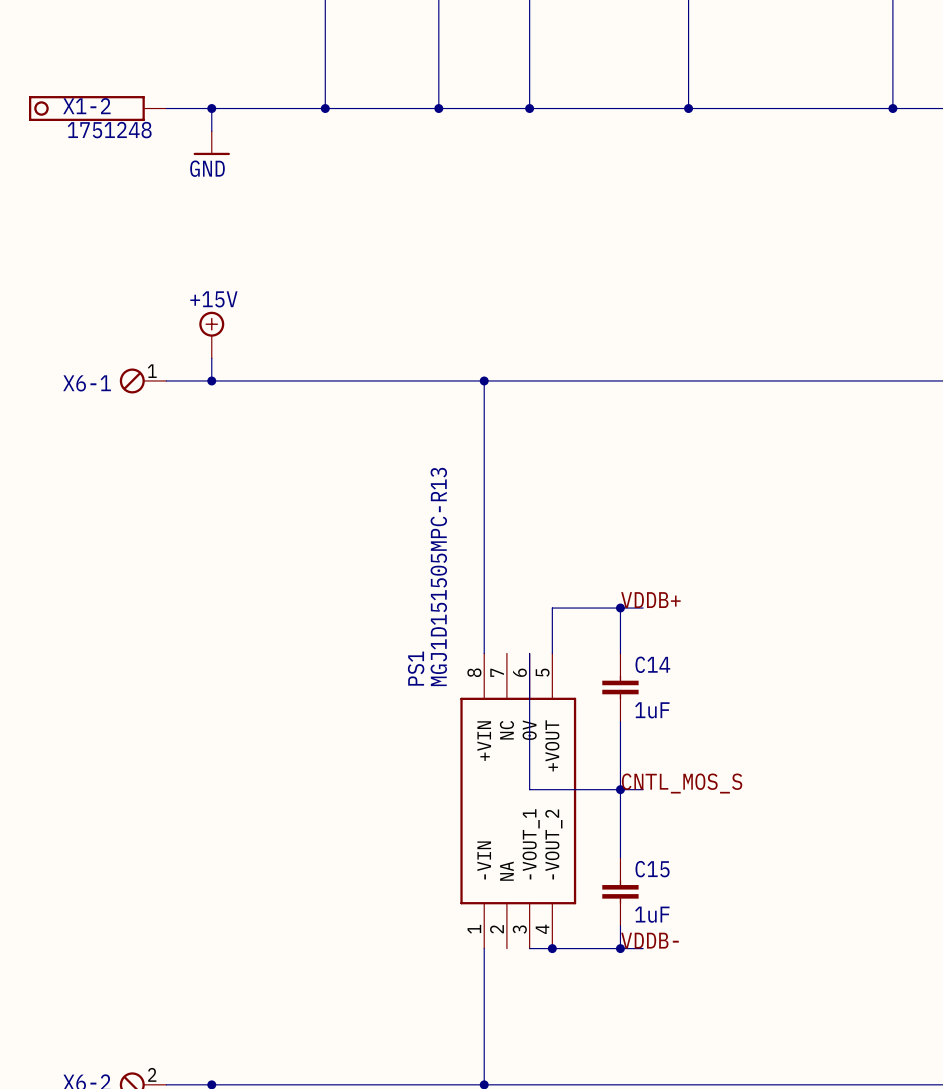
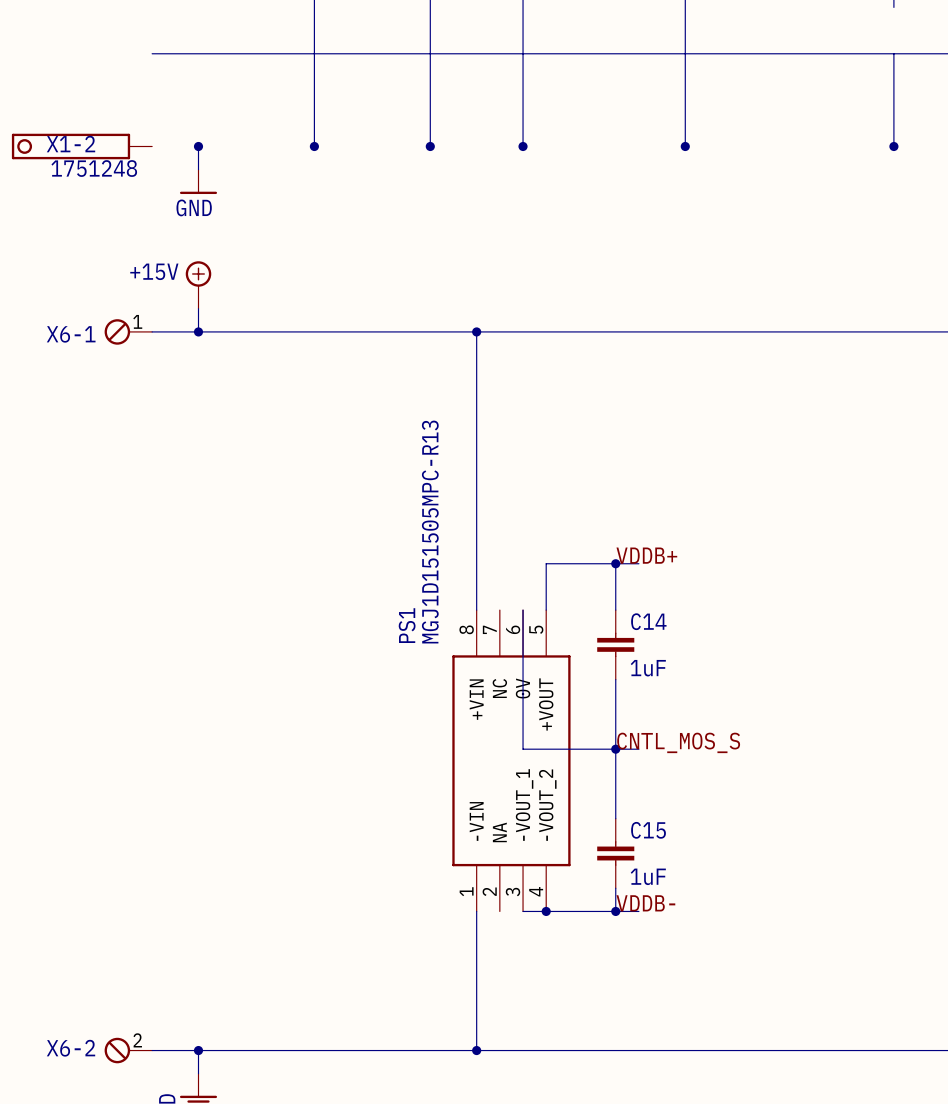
wire: (892, 63) (892, 108) -> (893, 146) (893, 53)
X1-2 position: (97, 108) -> (82, 146)
wire: (211, 108) (211, 131) -> (198, 146) (198, 169)
junction: (211, 108) -> none
wire: none -> (314, 53) (314, 146)
junction: (325, 108) -> none
wire: none -> (430, 53) (430, 146)
junction: (438, 108) -> none
wire: none -> (523, 53) (523, 146)
junction: (529, 108) -> none
wire: none -> (685, 53) (685, 146)
junction: (688, 108) -> none
junction: (892, 108) -> none
power symbol position: GND (211, 143) -> GND (198, 181)
junction: none -> (198, 146)
junction: none -> (314, 146)
junction: none -> (430, 146)
junction: none -> (523, 146)
junction: none -> (685, 146)
junction: none -> (893, 146)
power symbol text position: +15V (213, 299) -> +15V (154, 271)

